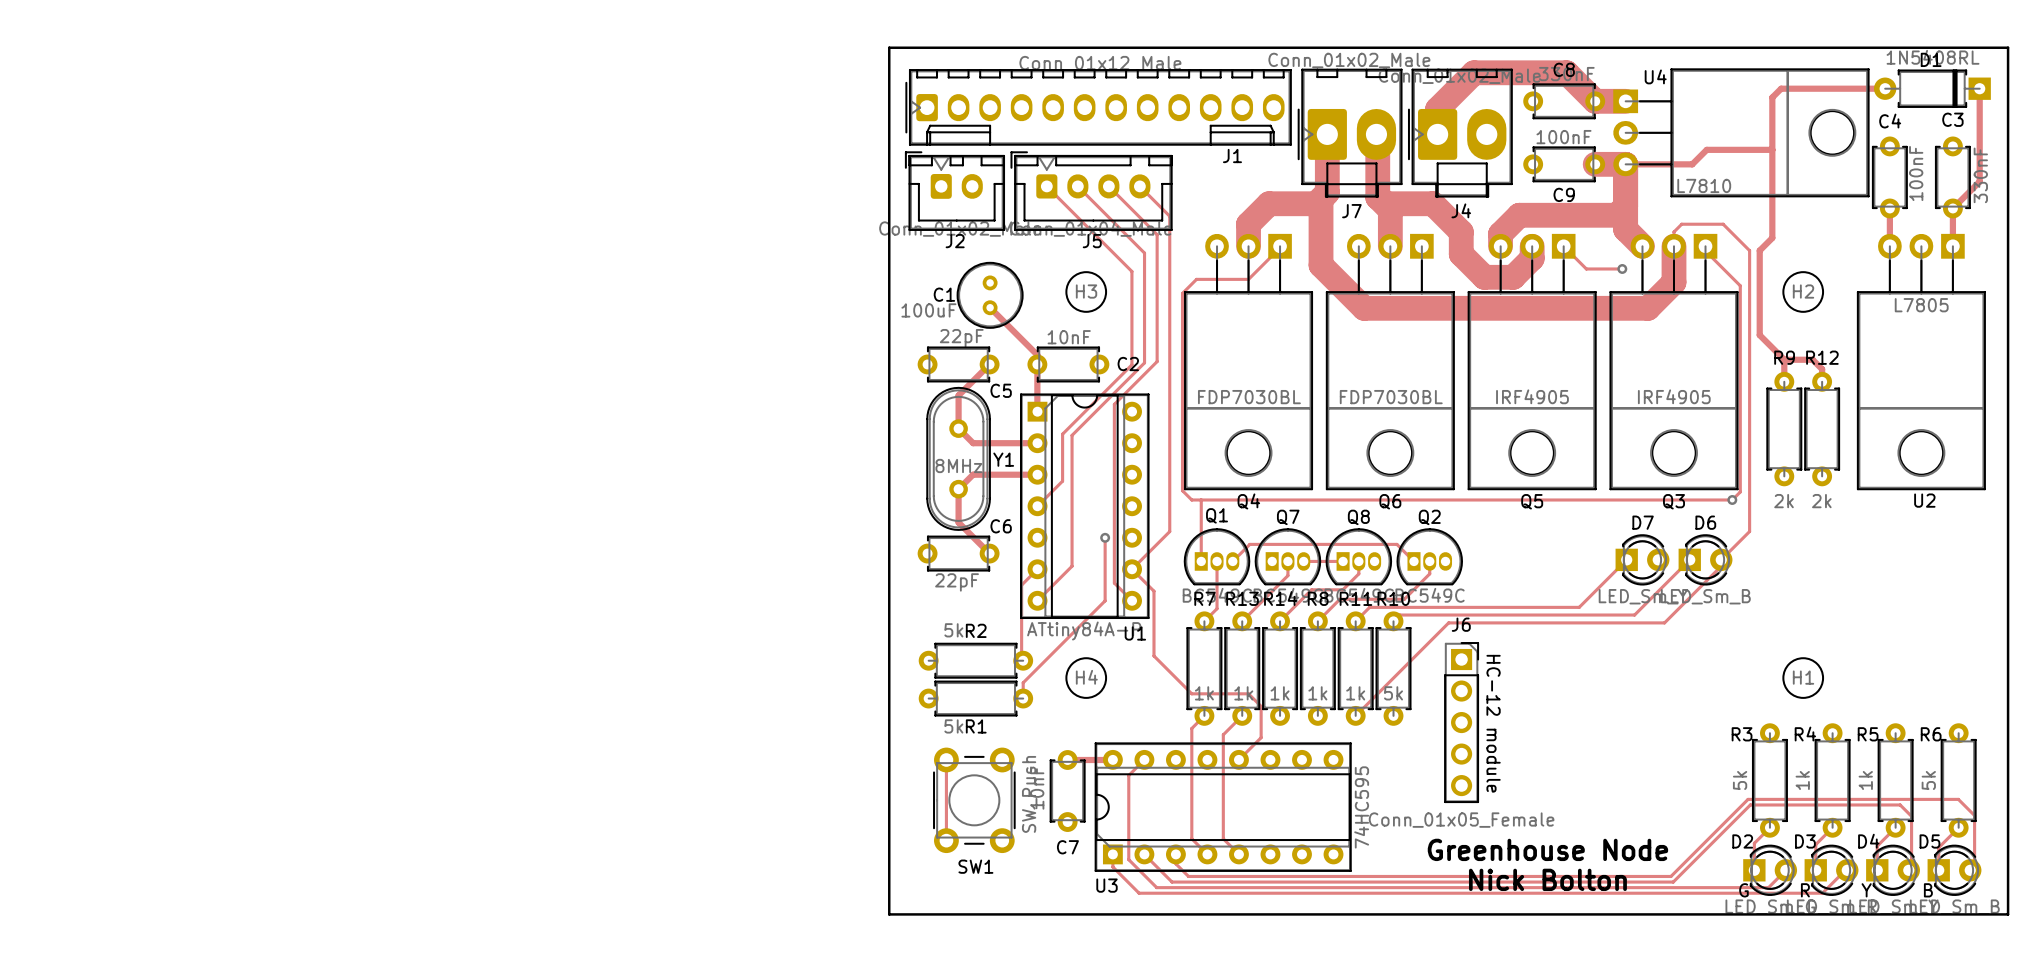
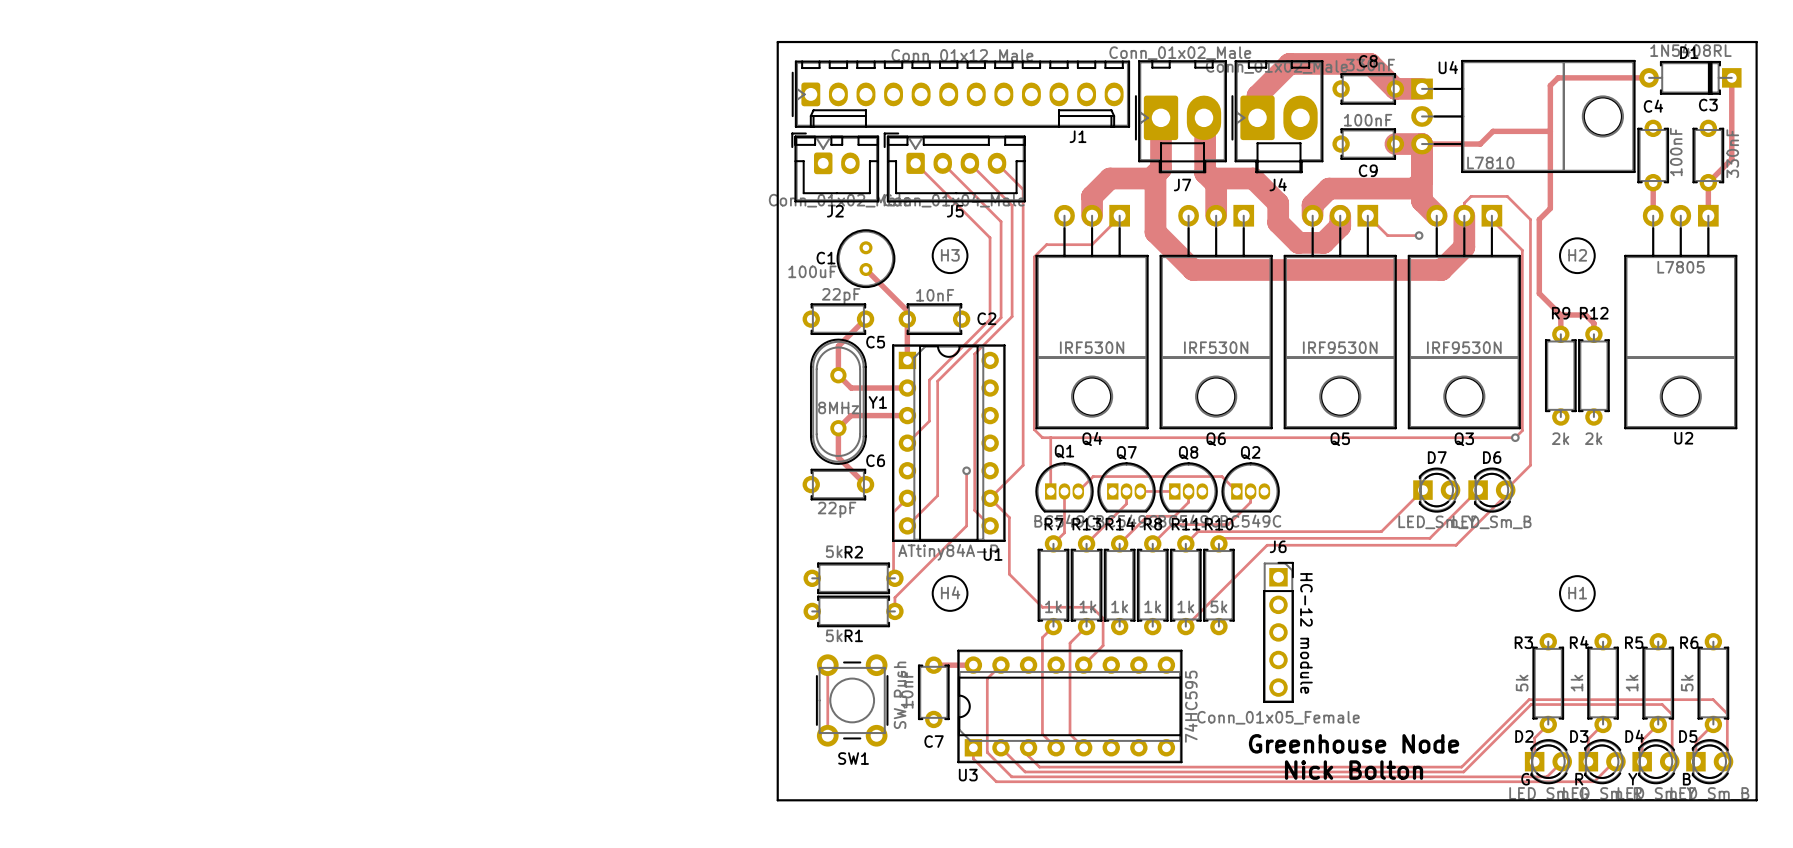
Q5 value: IRF4905 (1532, 396) -> IRF9530N (1340, 347)
Q3 value: IRF4905 (1674, 396) -> IRF9530N (1464, 347)
Q4 value: FDP7030BL (1249, 397) -> IRF530N (1092, 347)
Q6 value: FDP7030BL (1391, 397) -> IRF530N (1216, 347)

